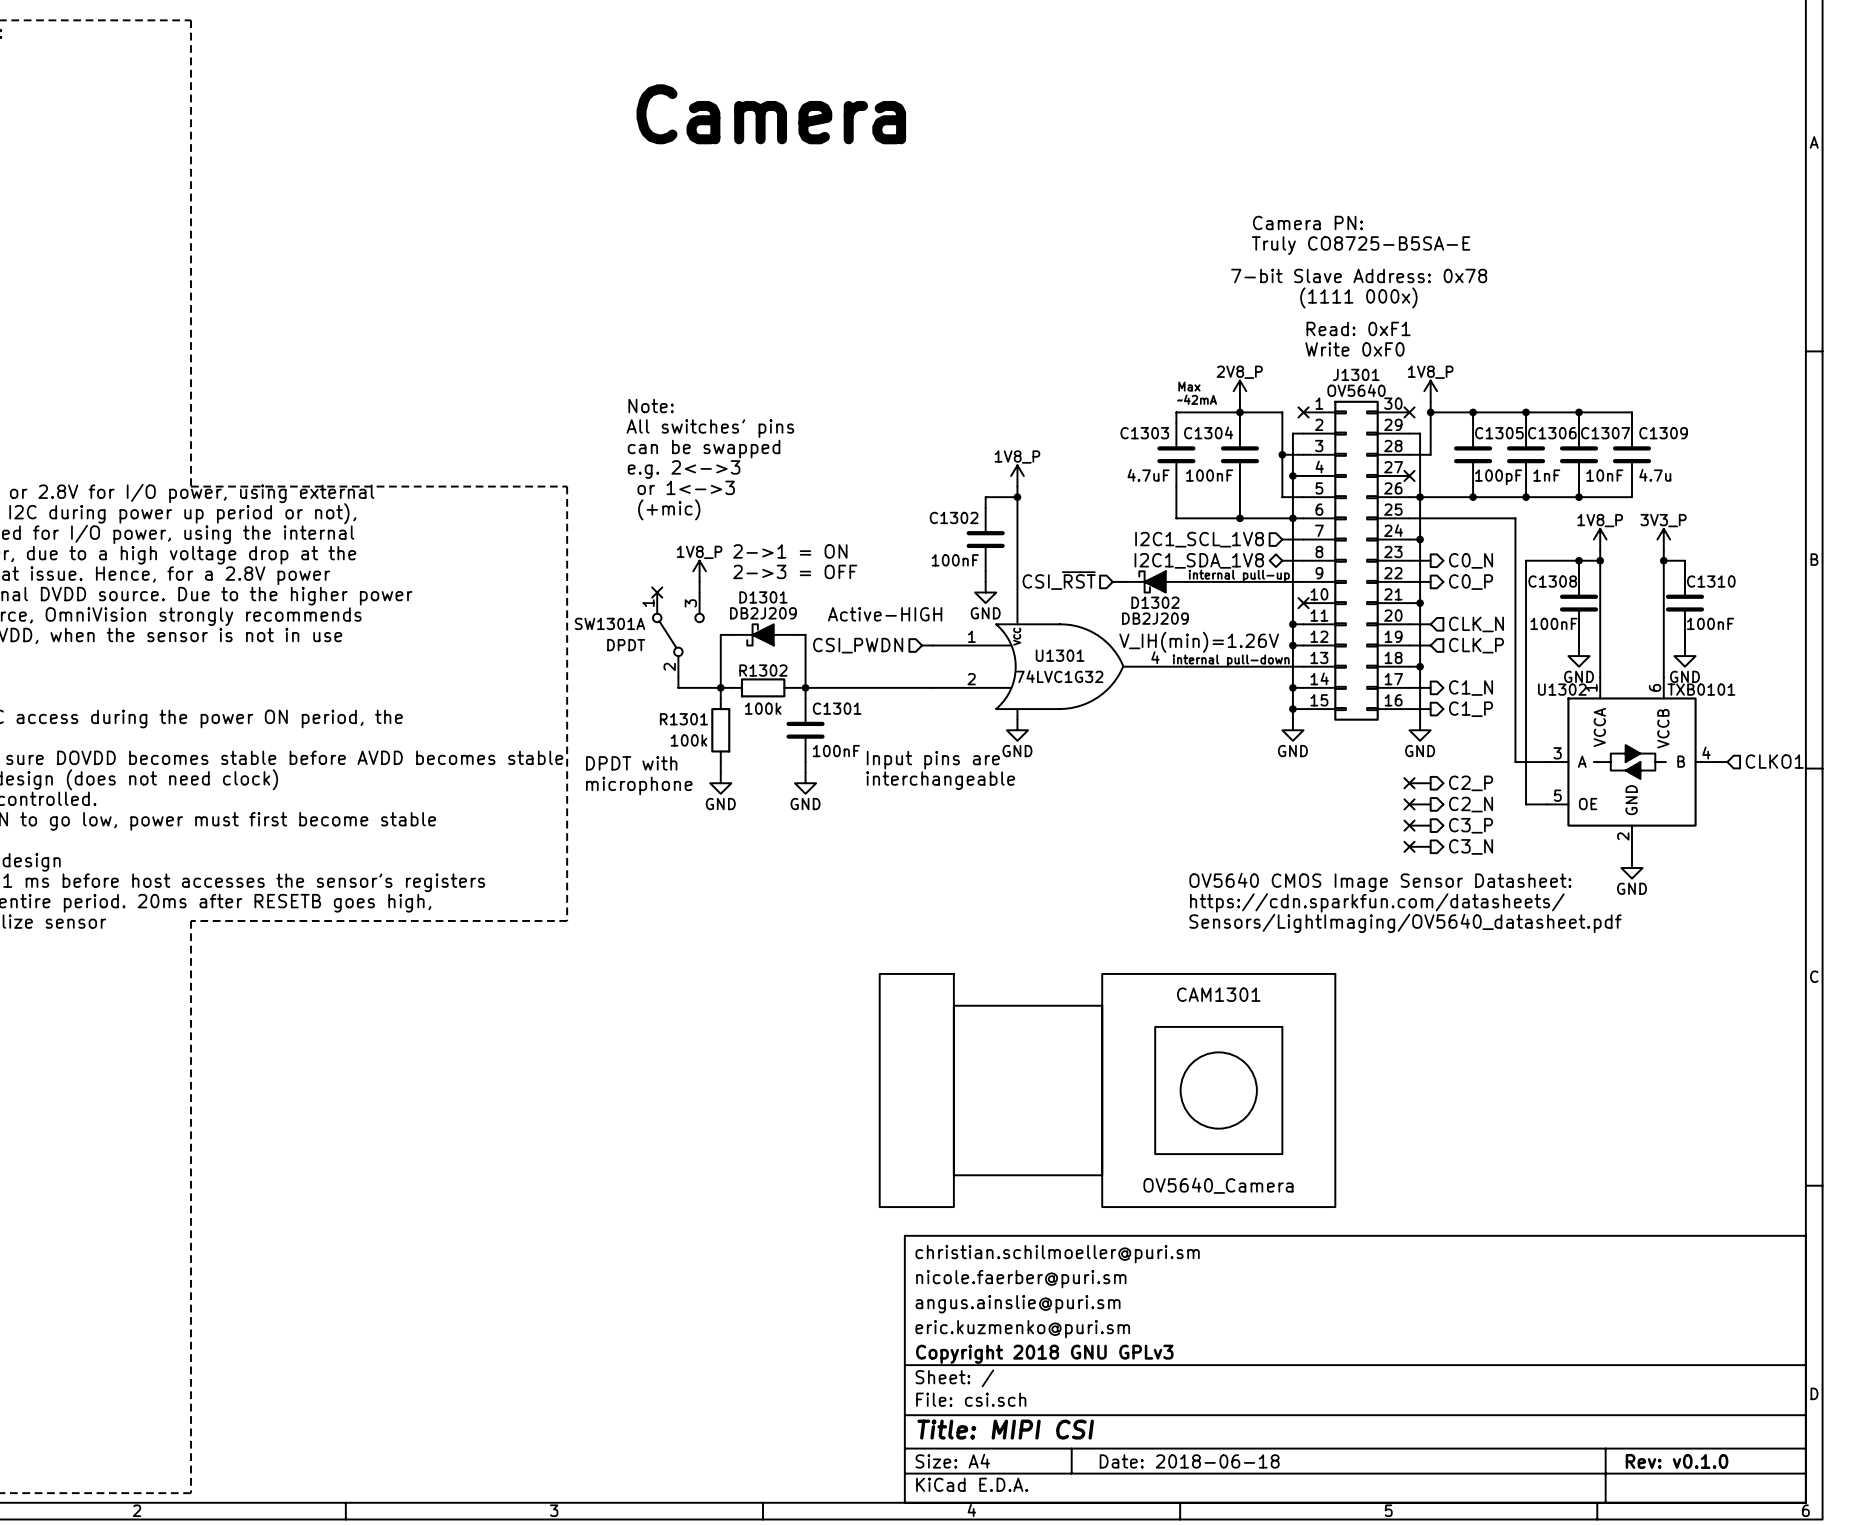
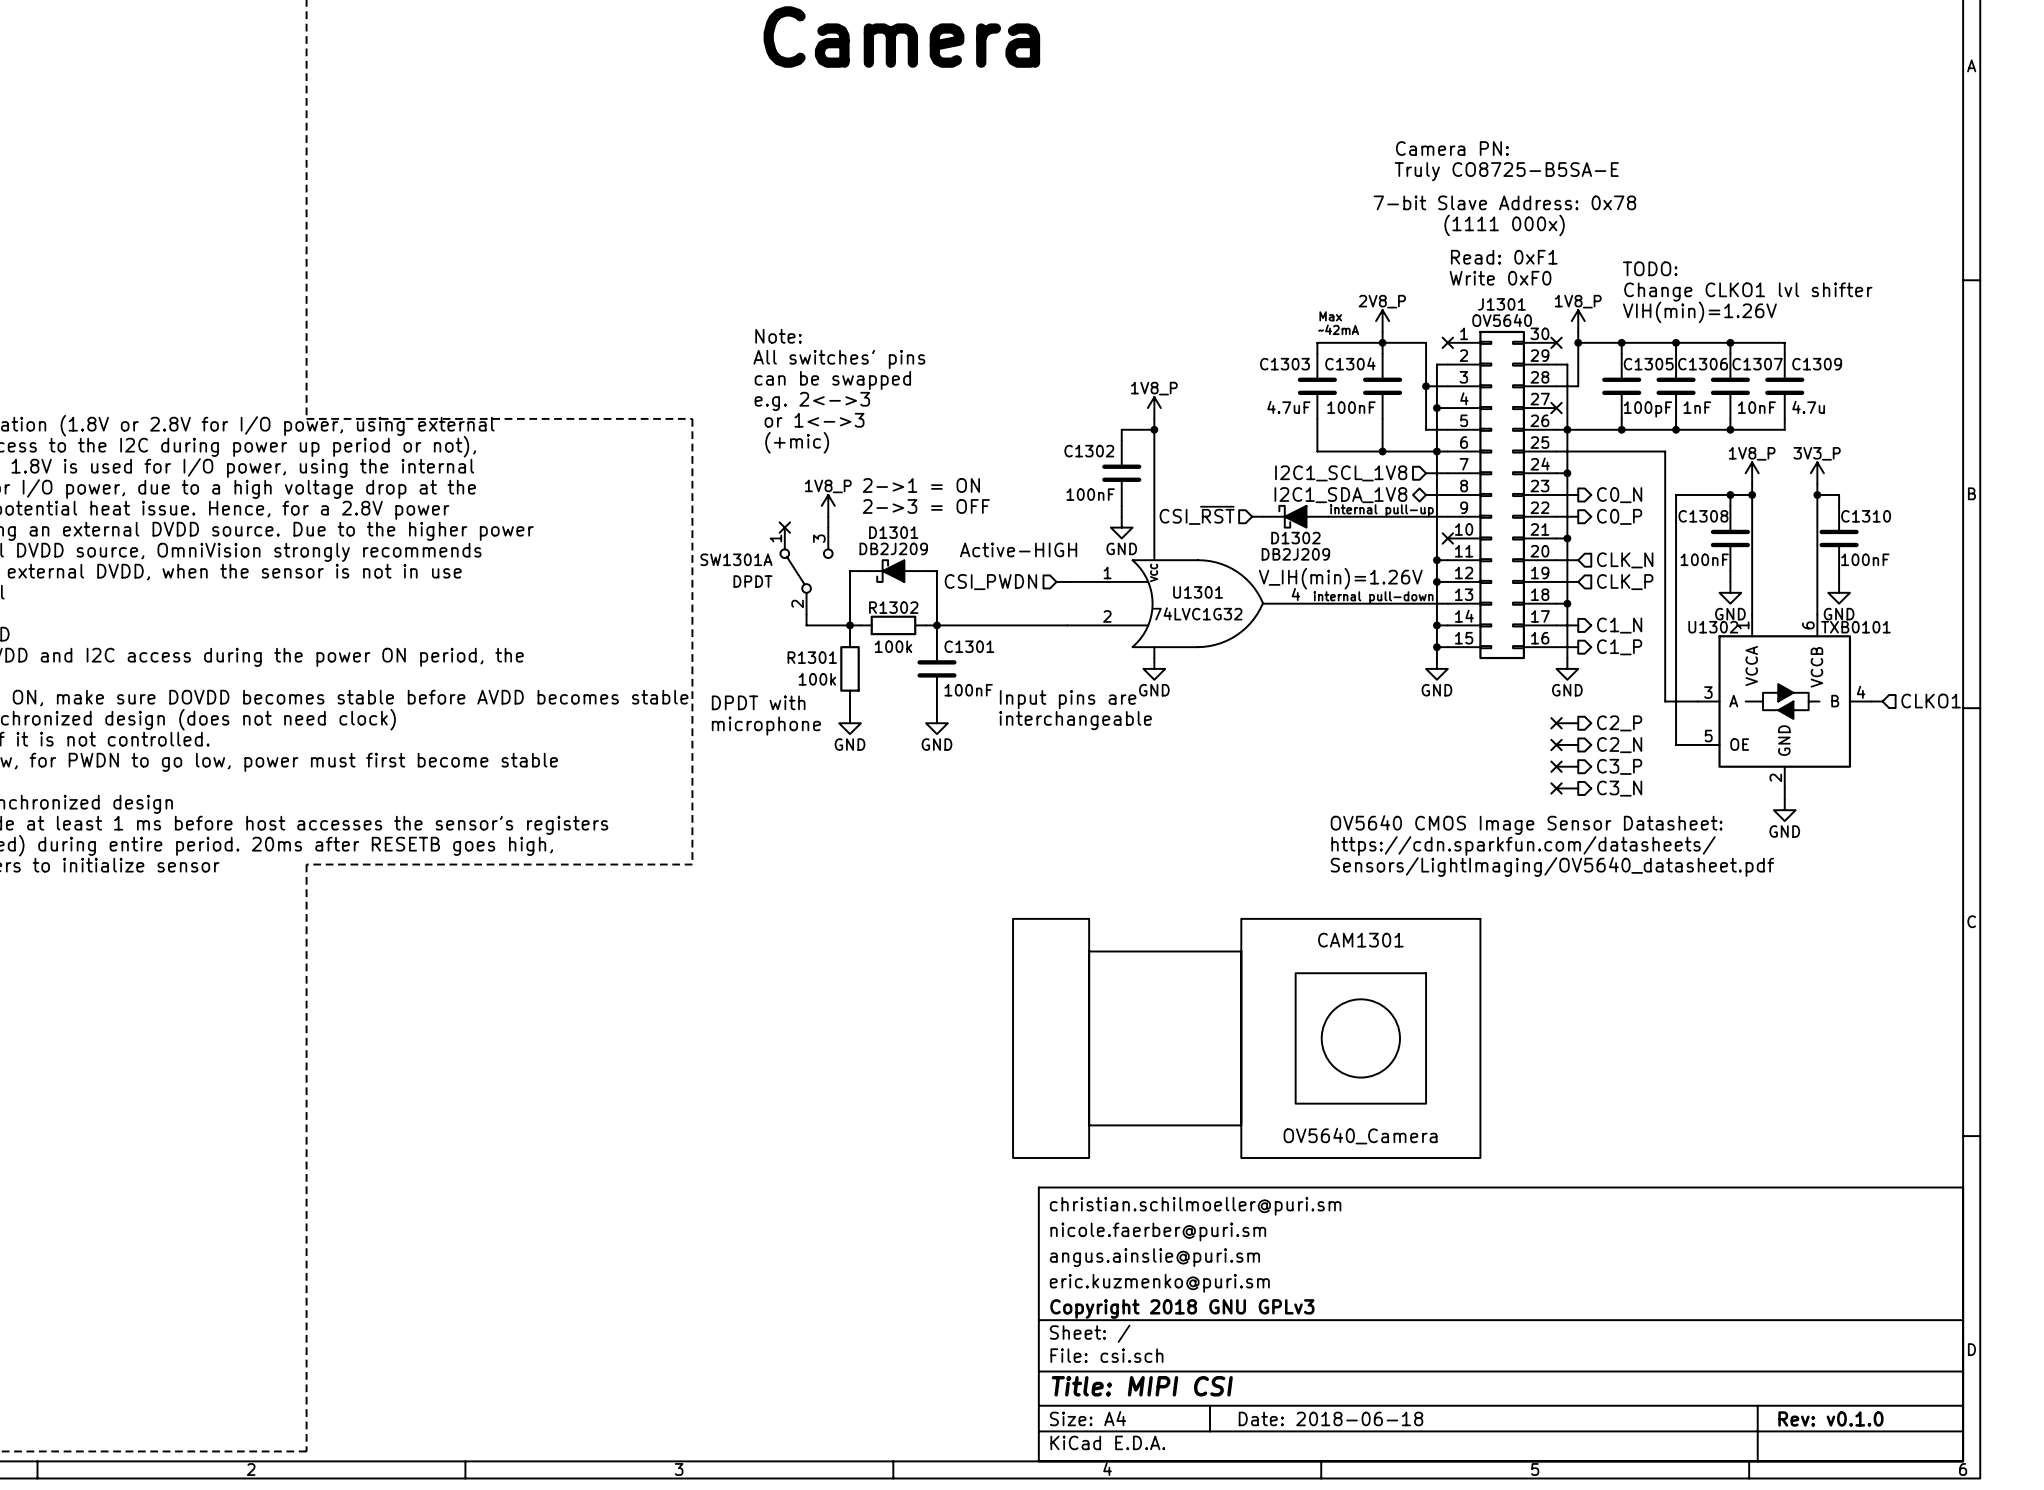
text: none -> TODO: (1650, 268)
text: none -> Change CLKO1 lvl shifter (1748, 292)
text: none -> VIH(min)=1.26V (1699, 312)

